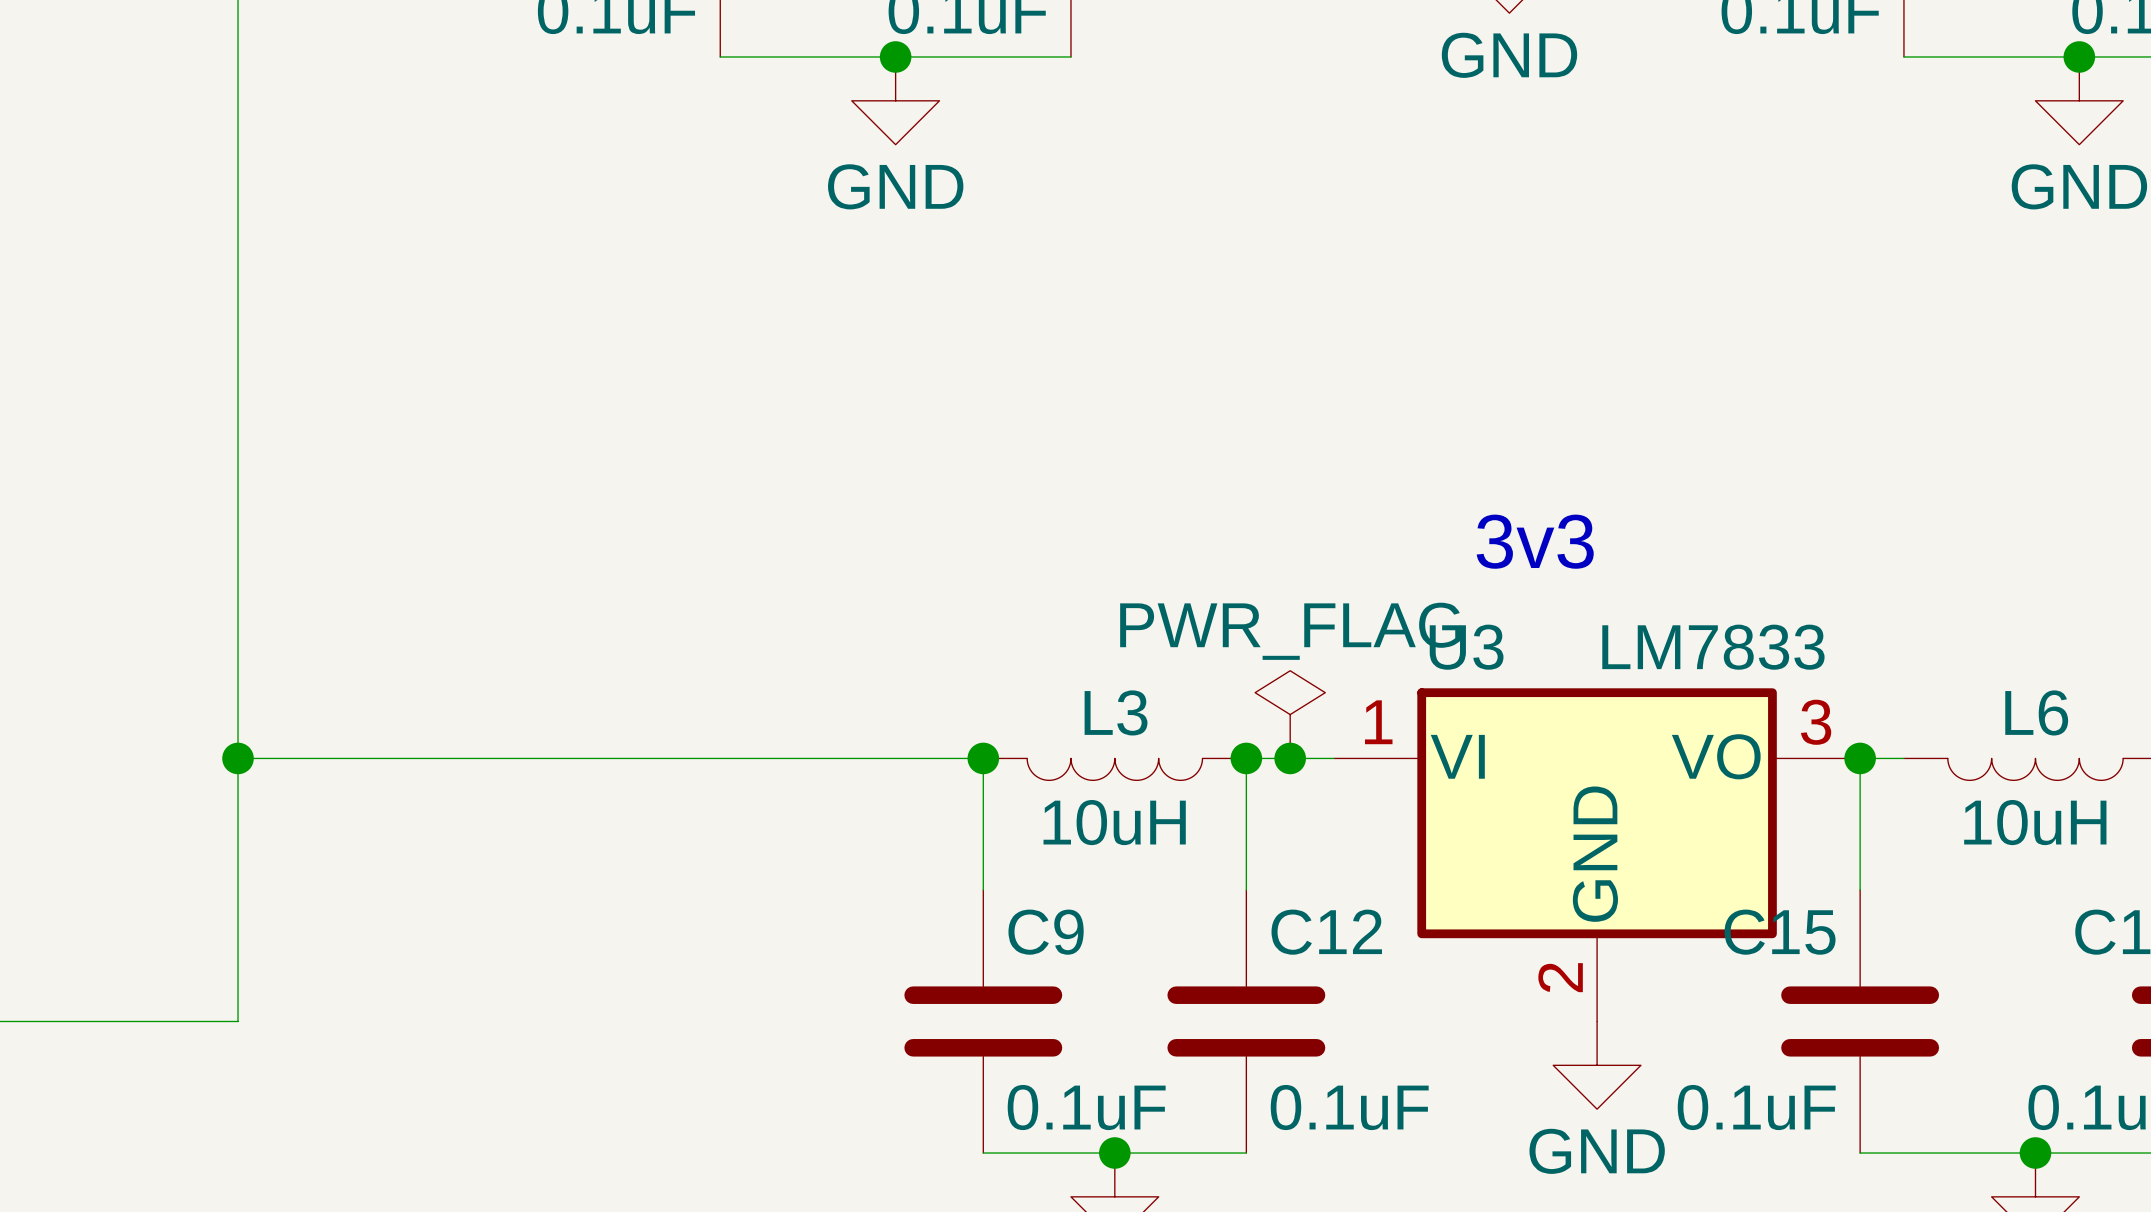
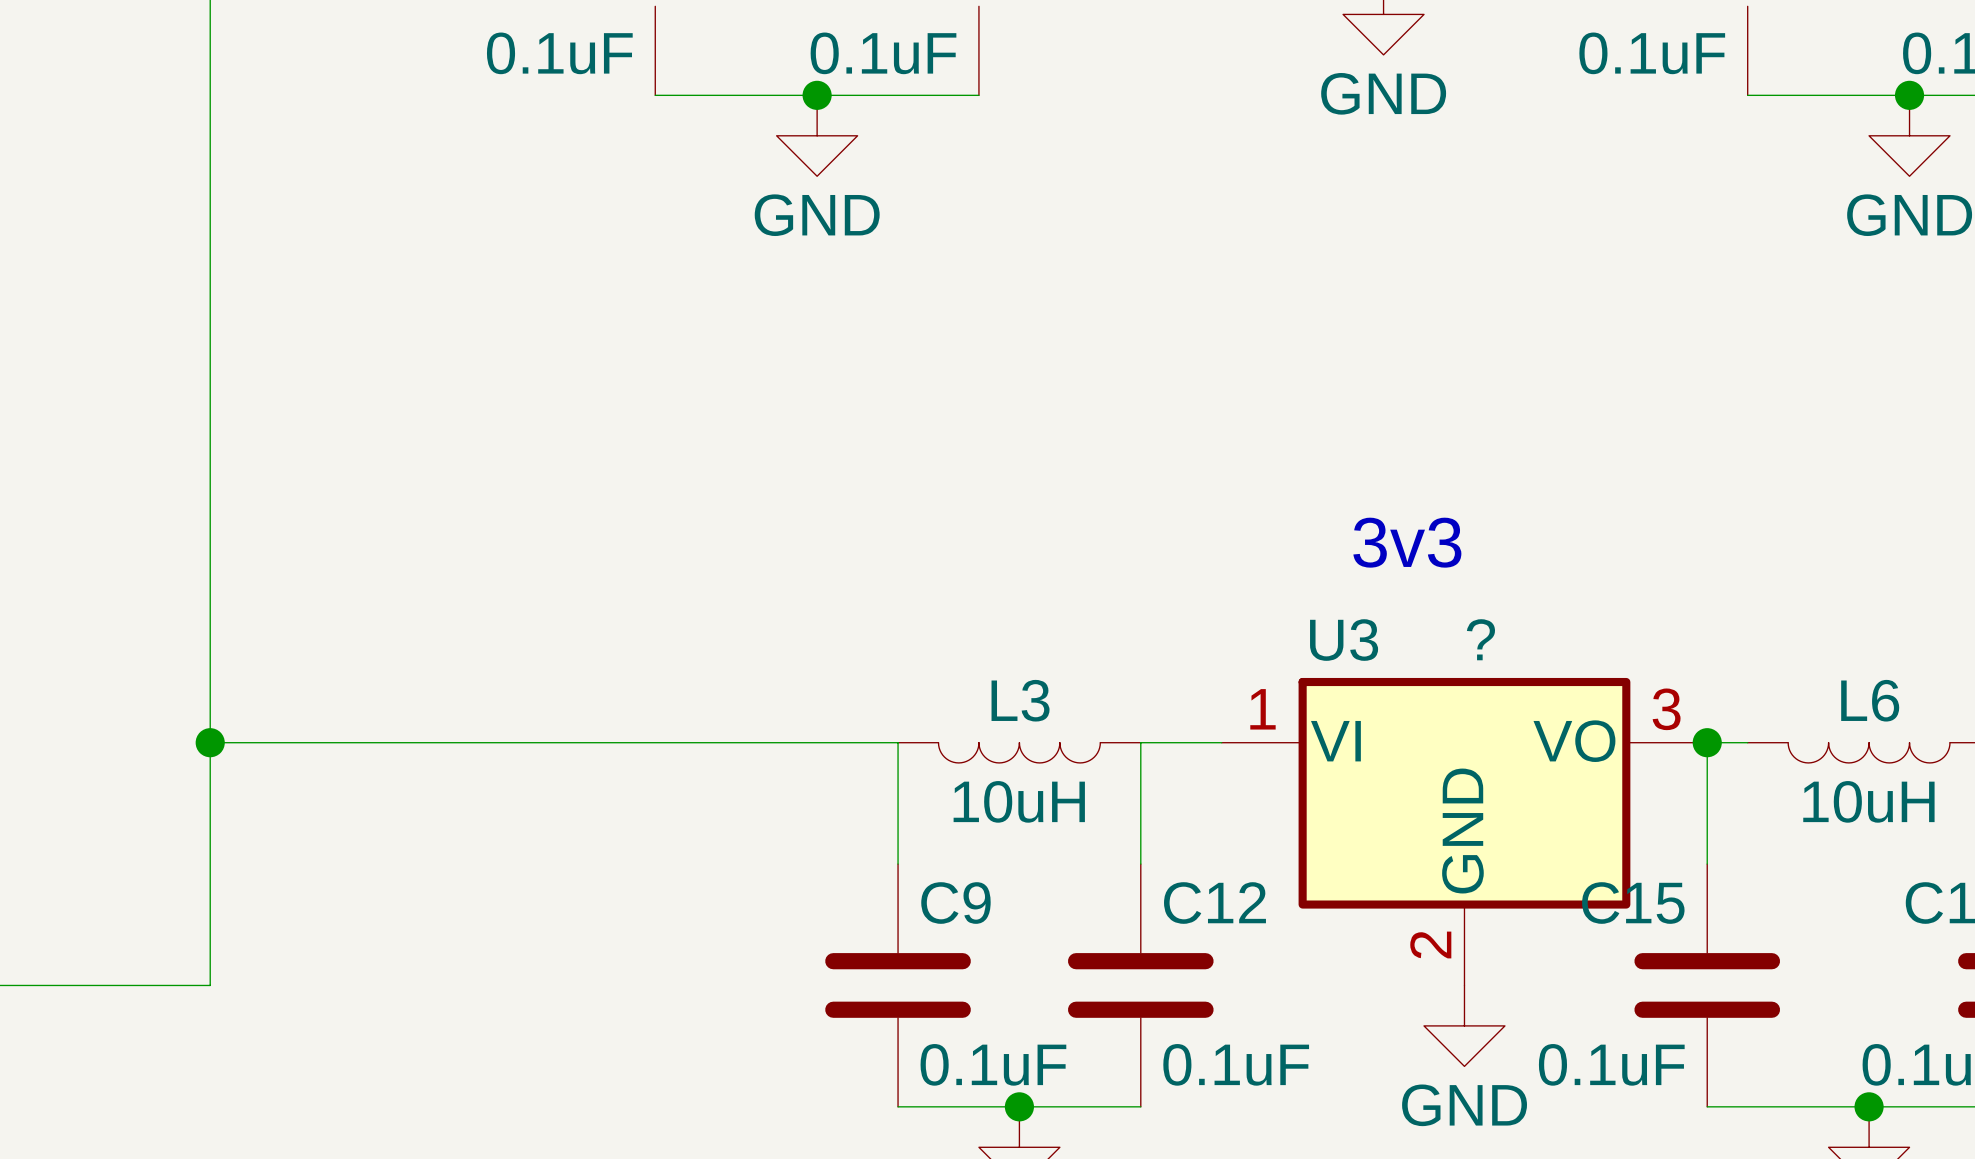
U3 value: LM7833 (1713, 647) -> ? (1480, 639)
power symbol: PWR_FLAG (1290, 714) -> none
junction: (983, 758) -> none
junction: (1246, 758) -> none
junction: (1290, 758) -> none

